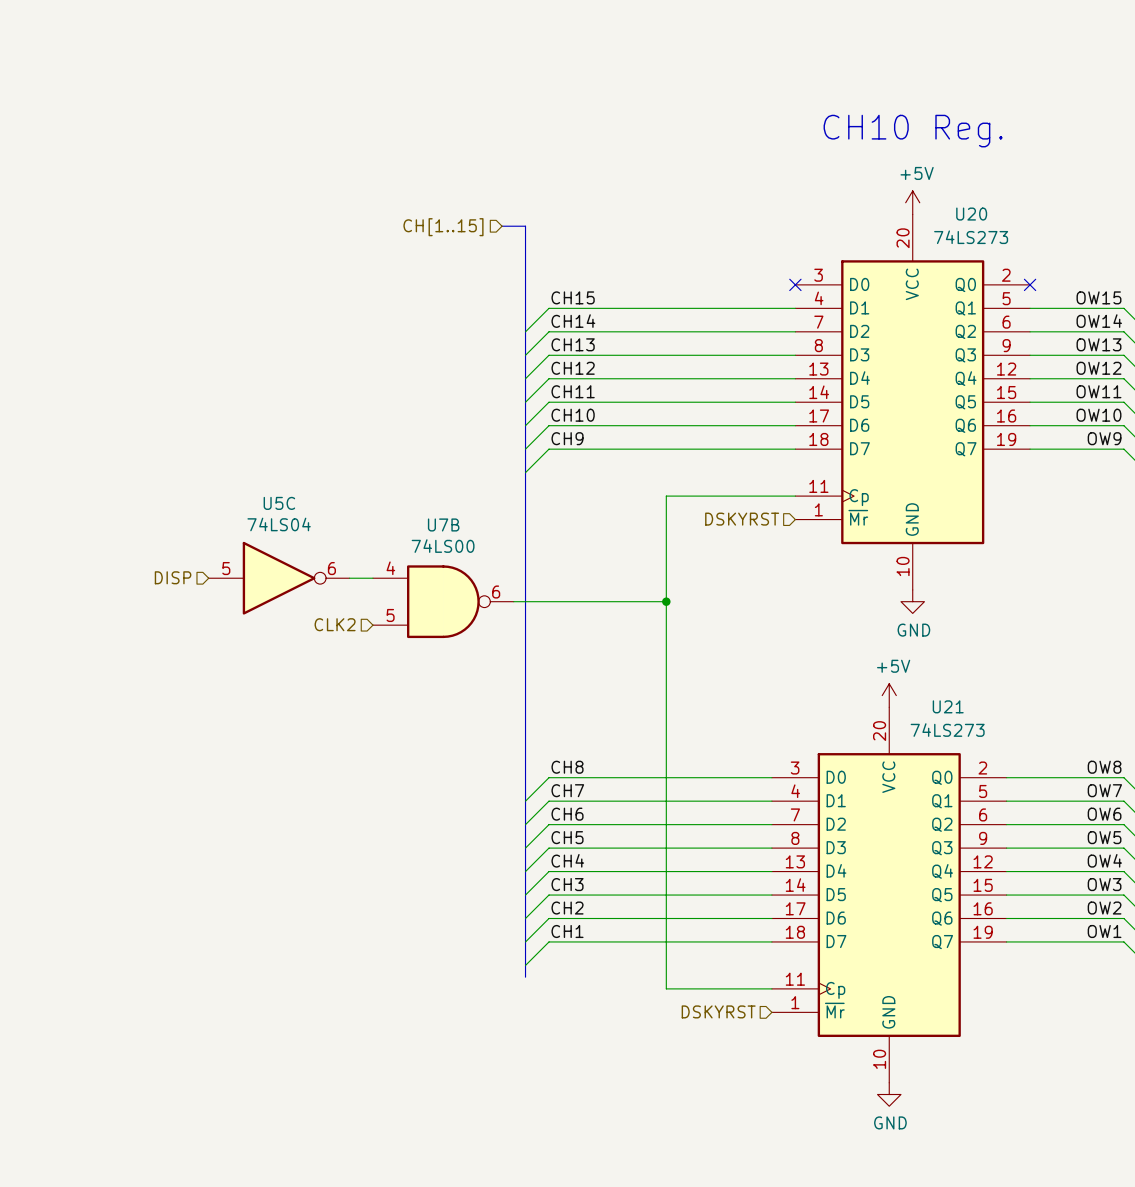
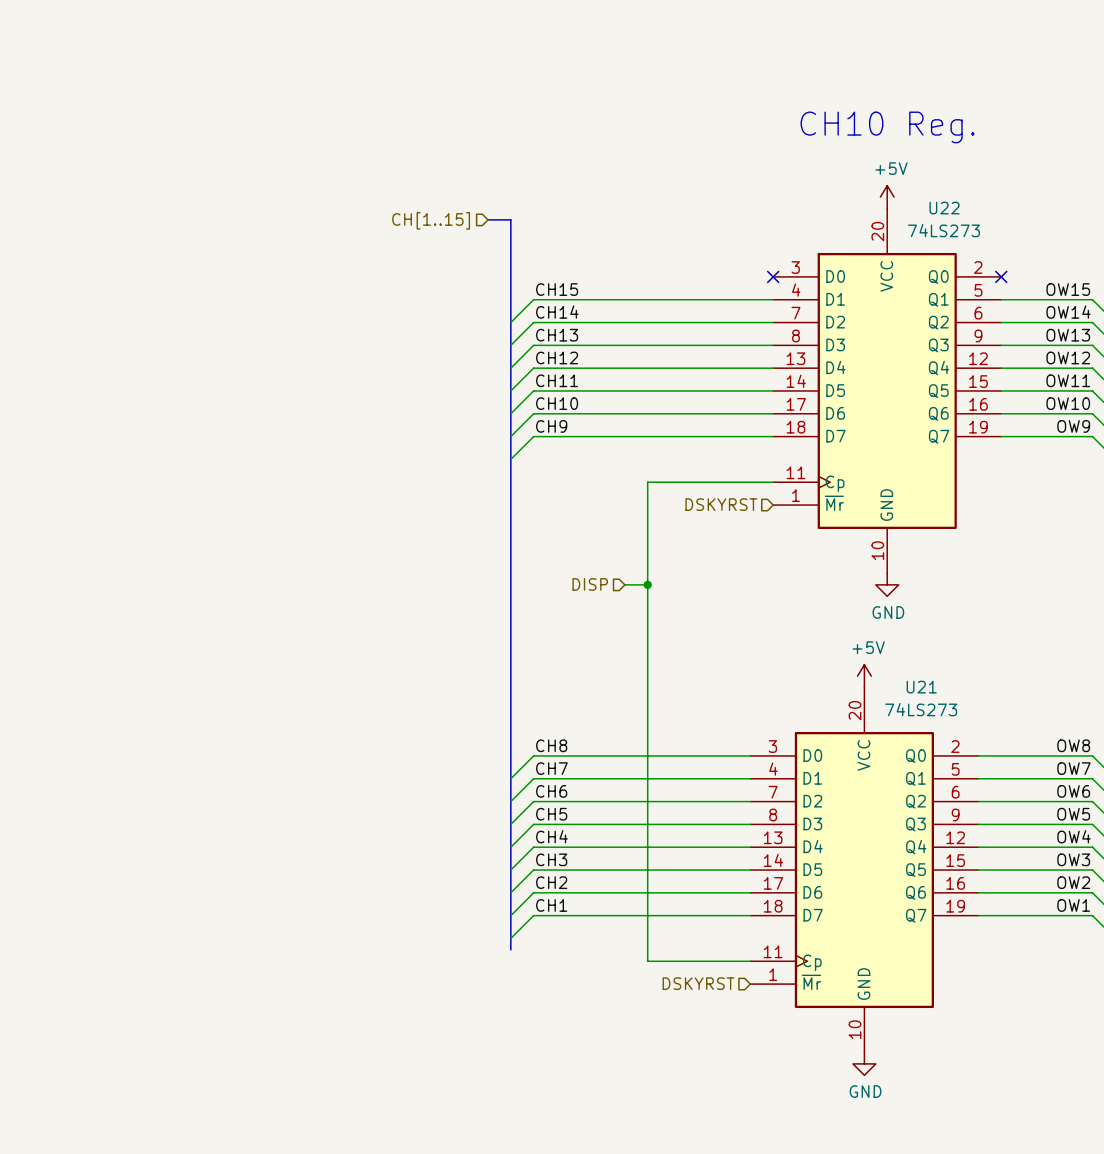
U20 name: U20 (971, 214) -> U22 (944, 208)
hierarchical label: DISP (173, 577) -> none
U5C: 74LS04 (279, 578) -> none
wire: (349, 578) (372, 578) -> none
U7B: 74LS00 (443, 601) -> none
wire: (513, 601) (642, 601) -> none
hierarchical label: none -> DISP (590, 584)
hierarchical label: CLK2 (335, 624) -> none

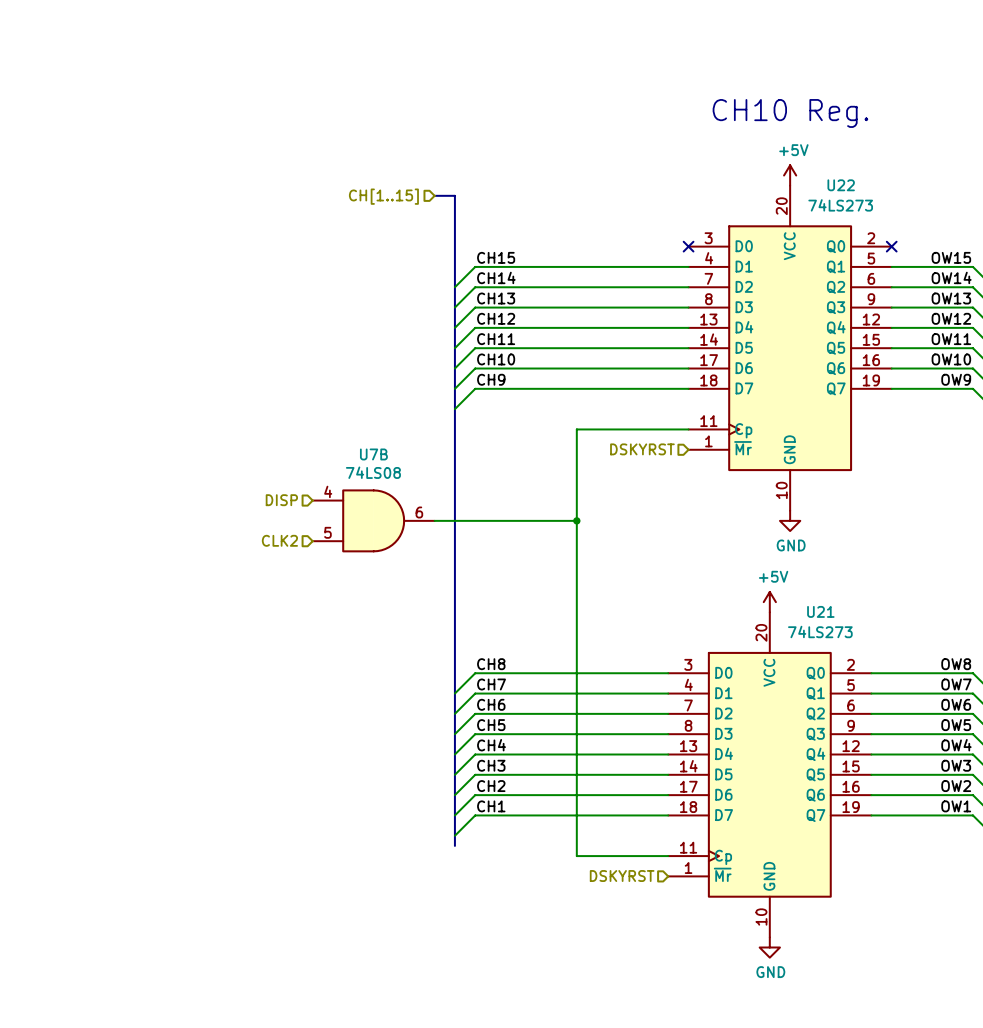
hierarchical label: none -> DISP (281, 500)
U7B: none -> 74LS08 (373, 520)
wire: none -> (434, 520) (556, 520)
hierarchical label: DISP (590, 584) -> none
hierarchical label: none -> CLK2 (279, 540)

